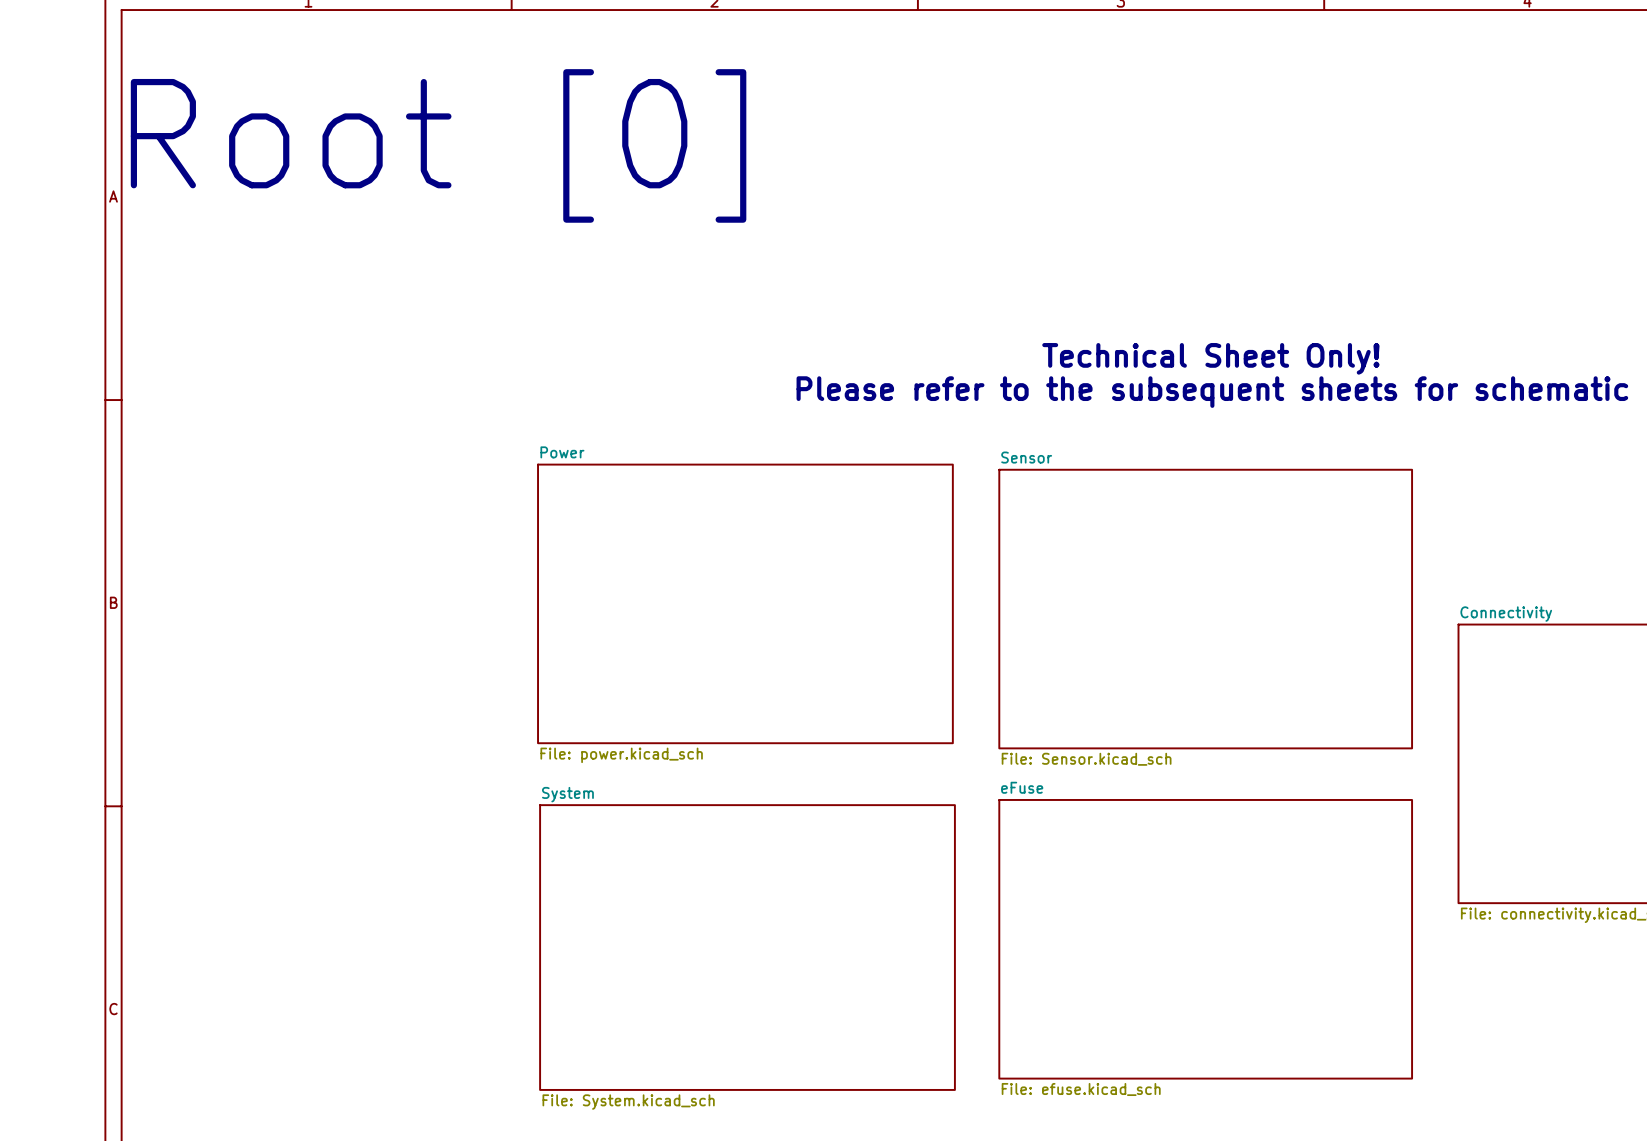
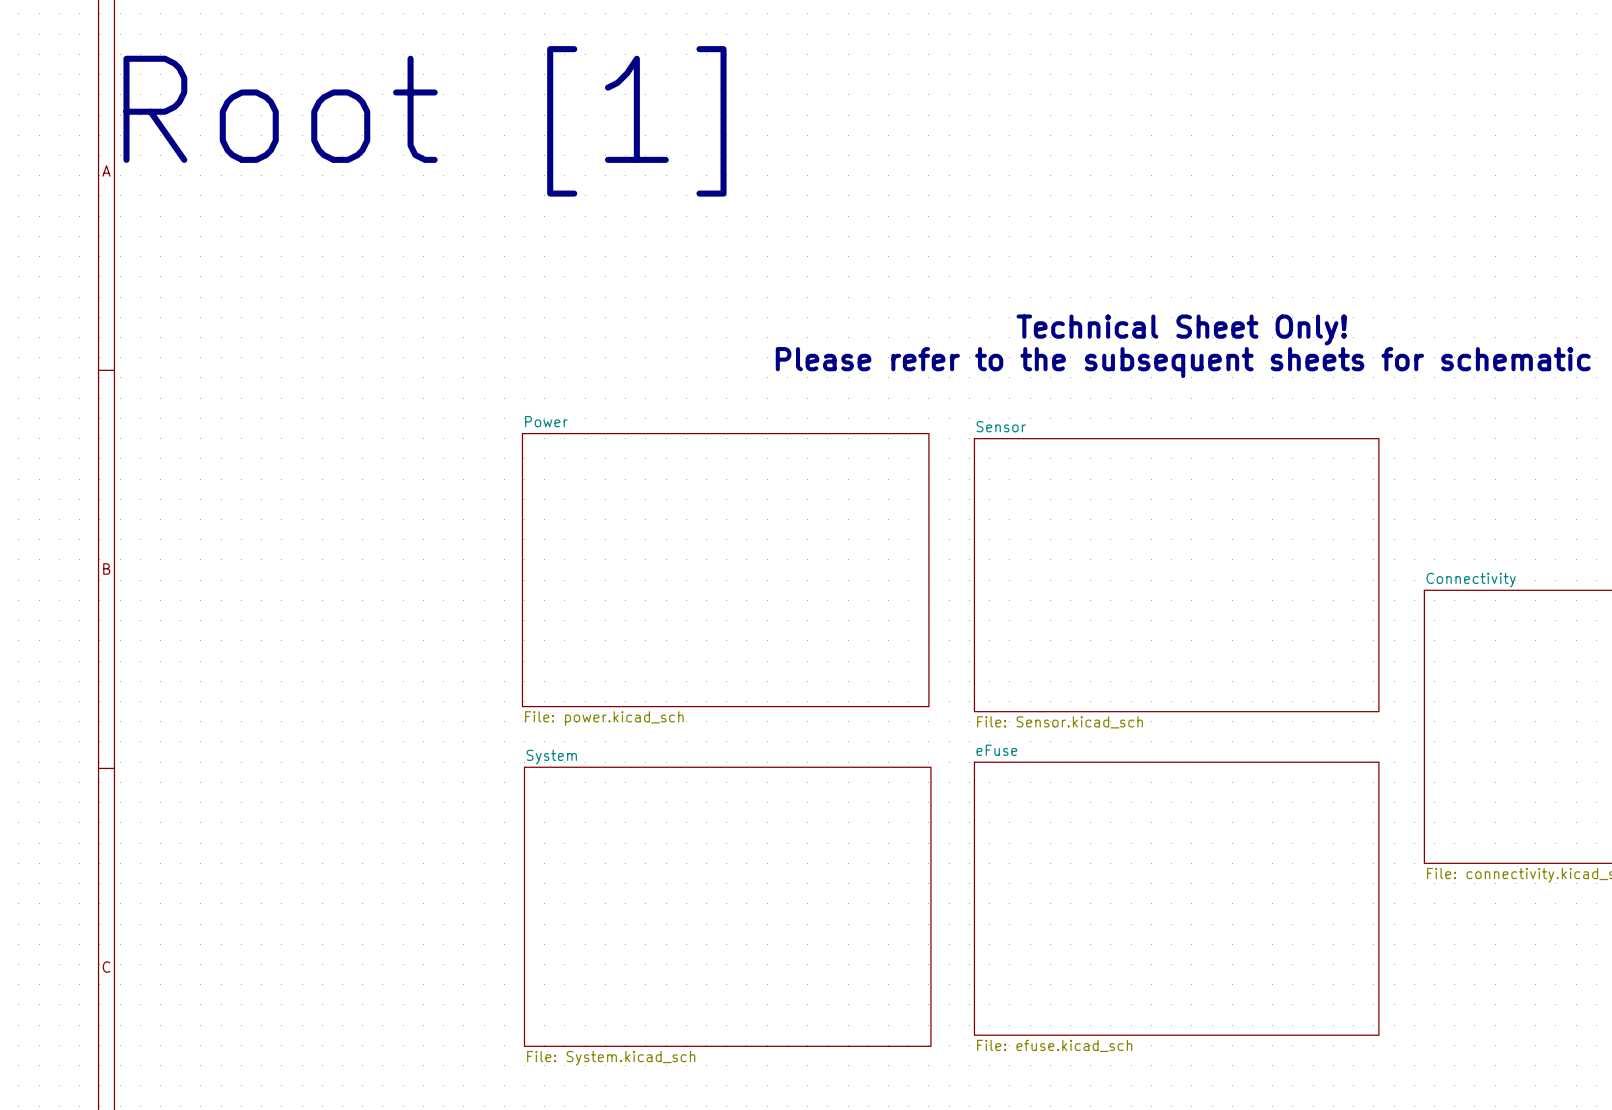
text: Root [0] (438, 145) -> Root [1] (425, 121)

